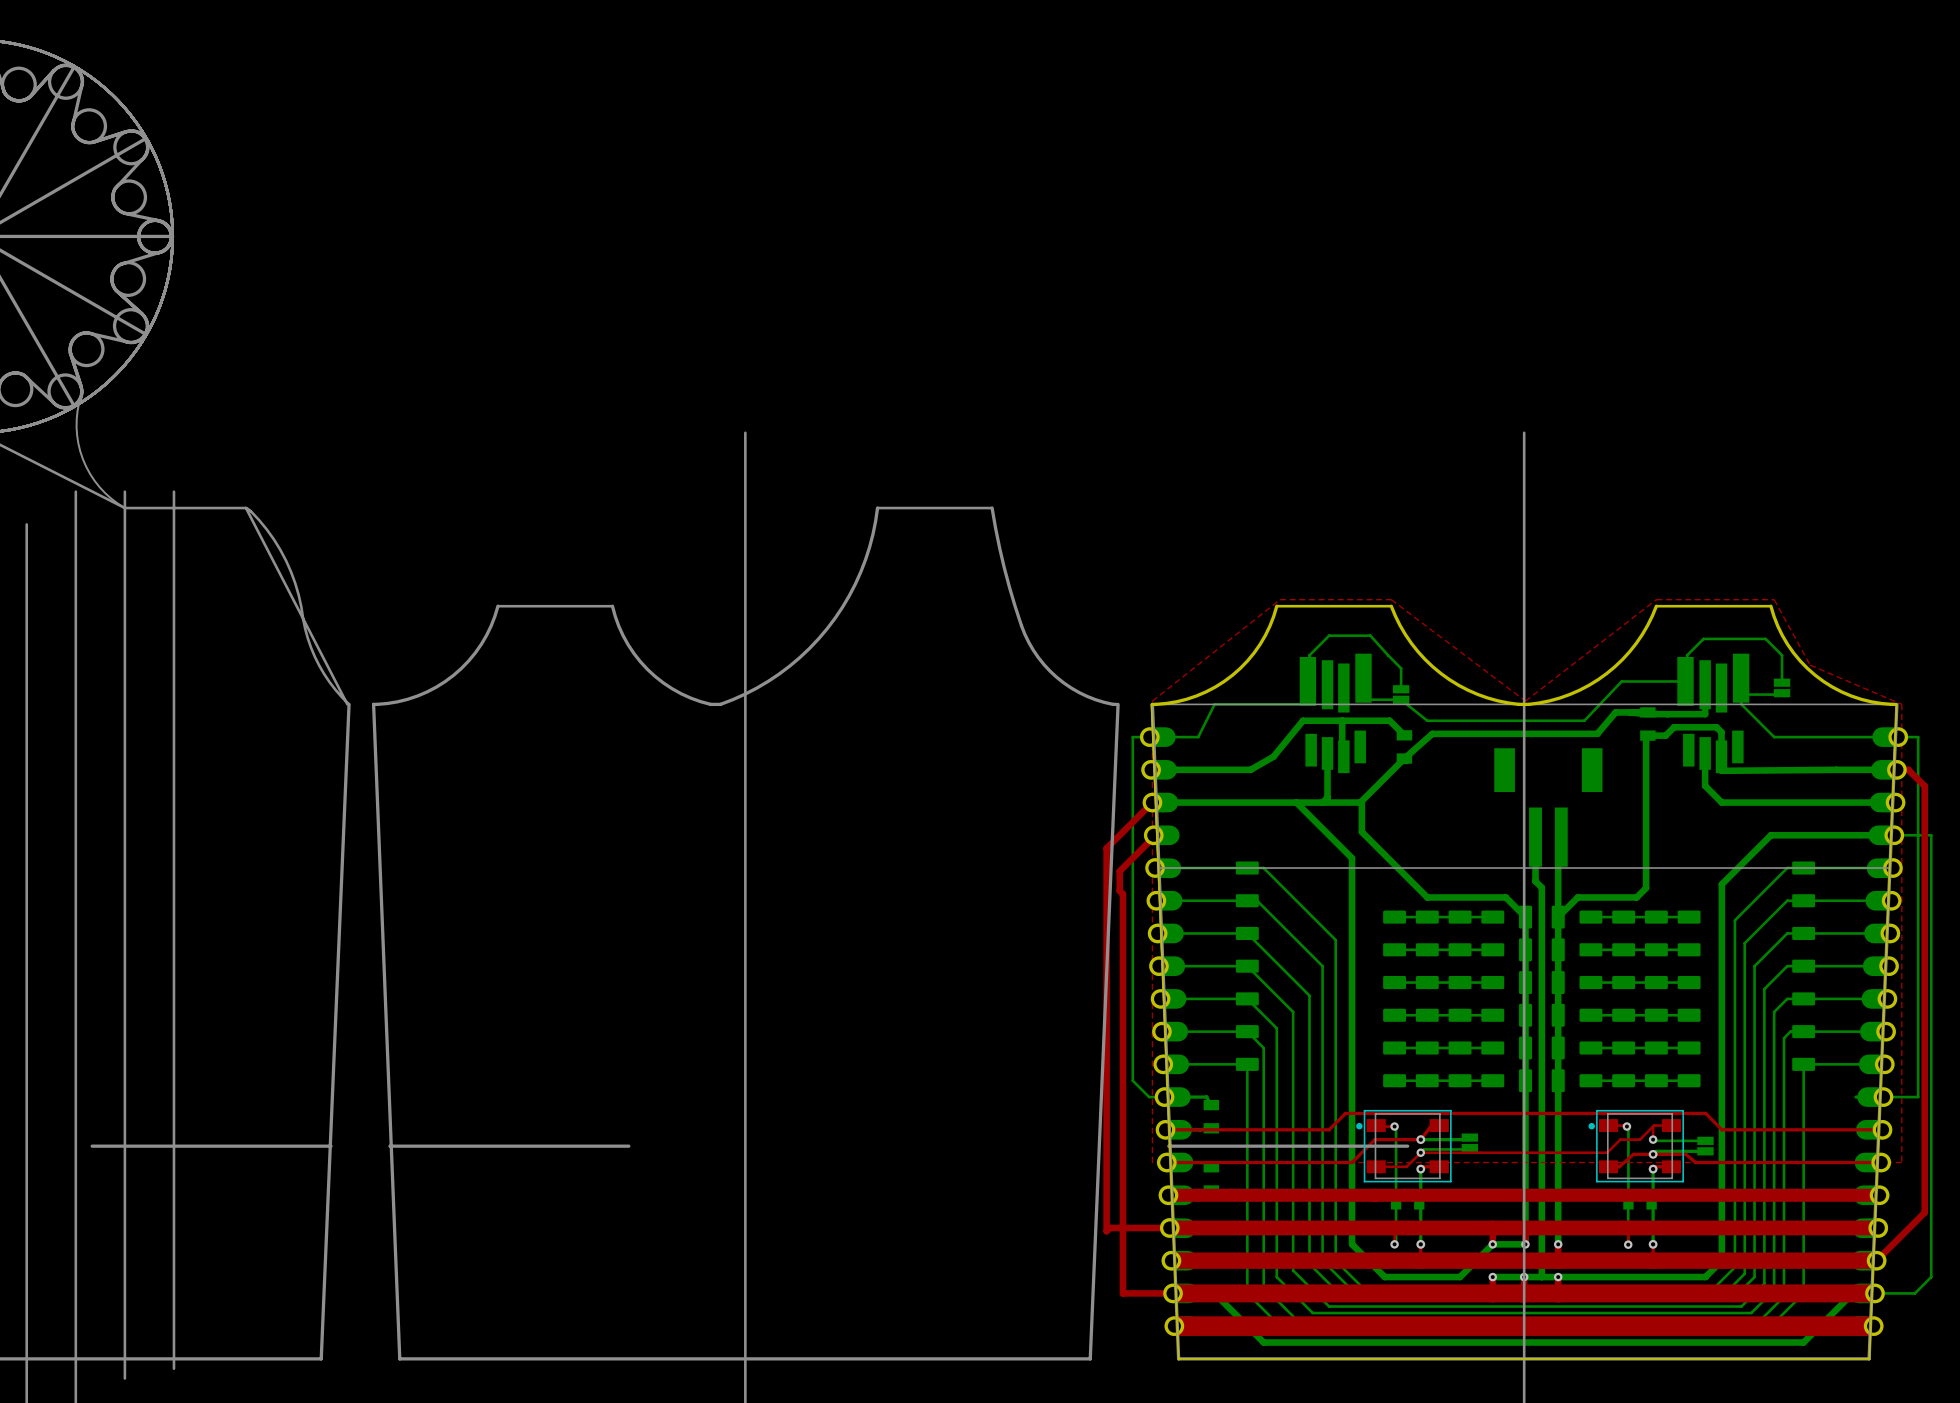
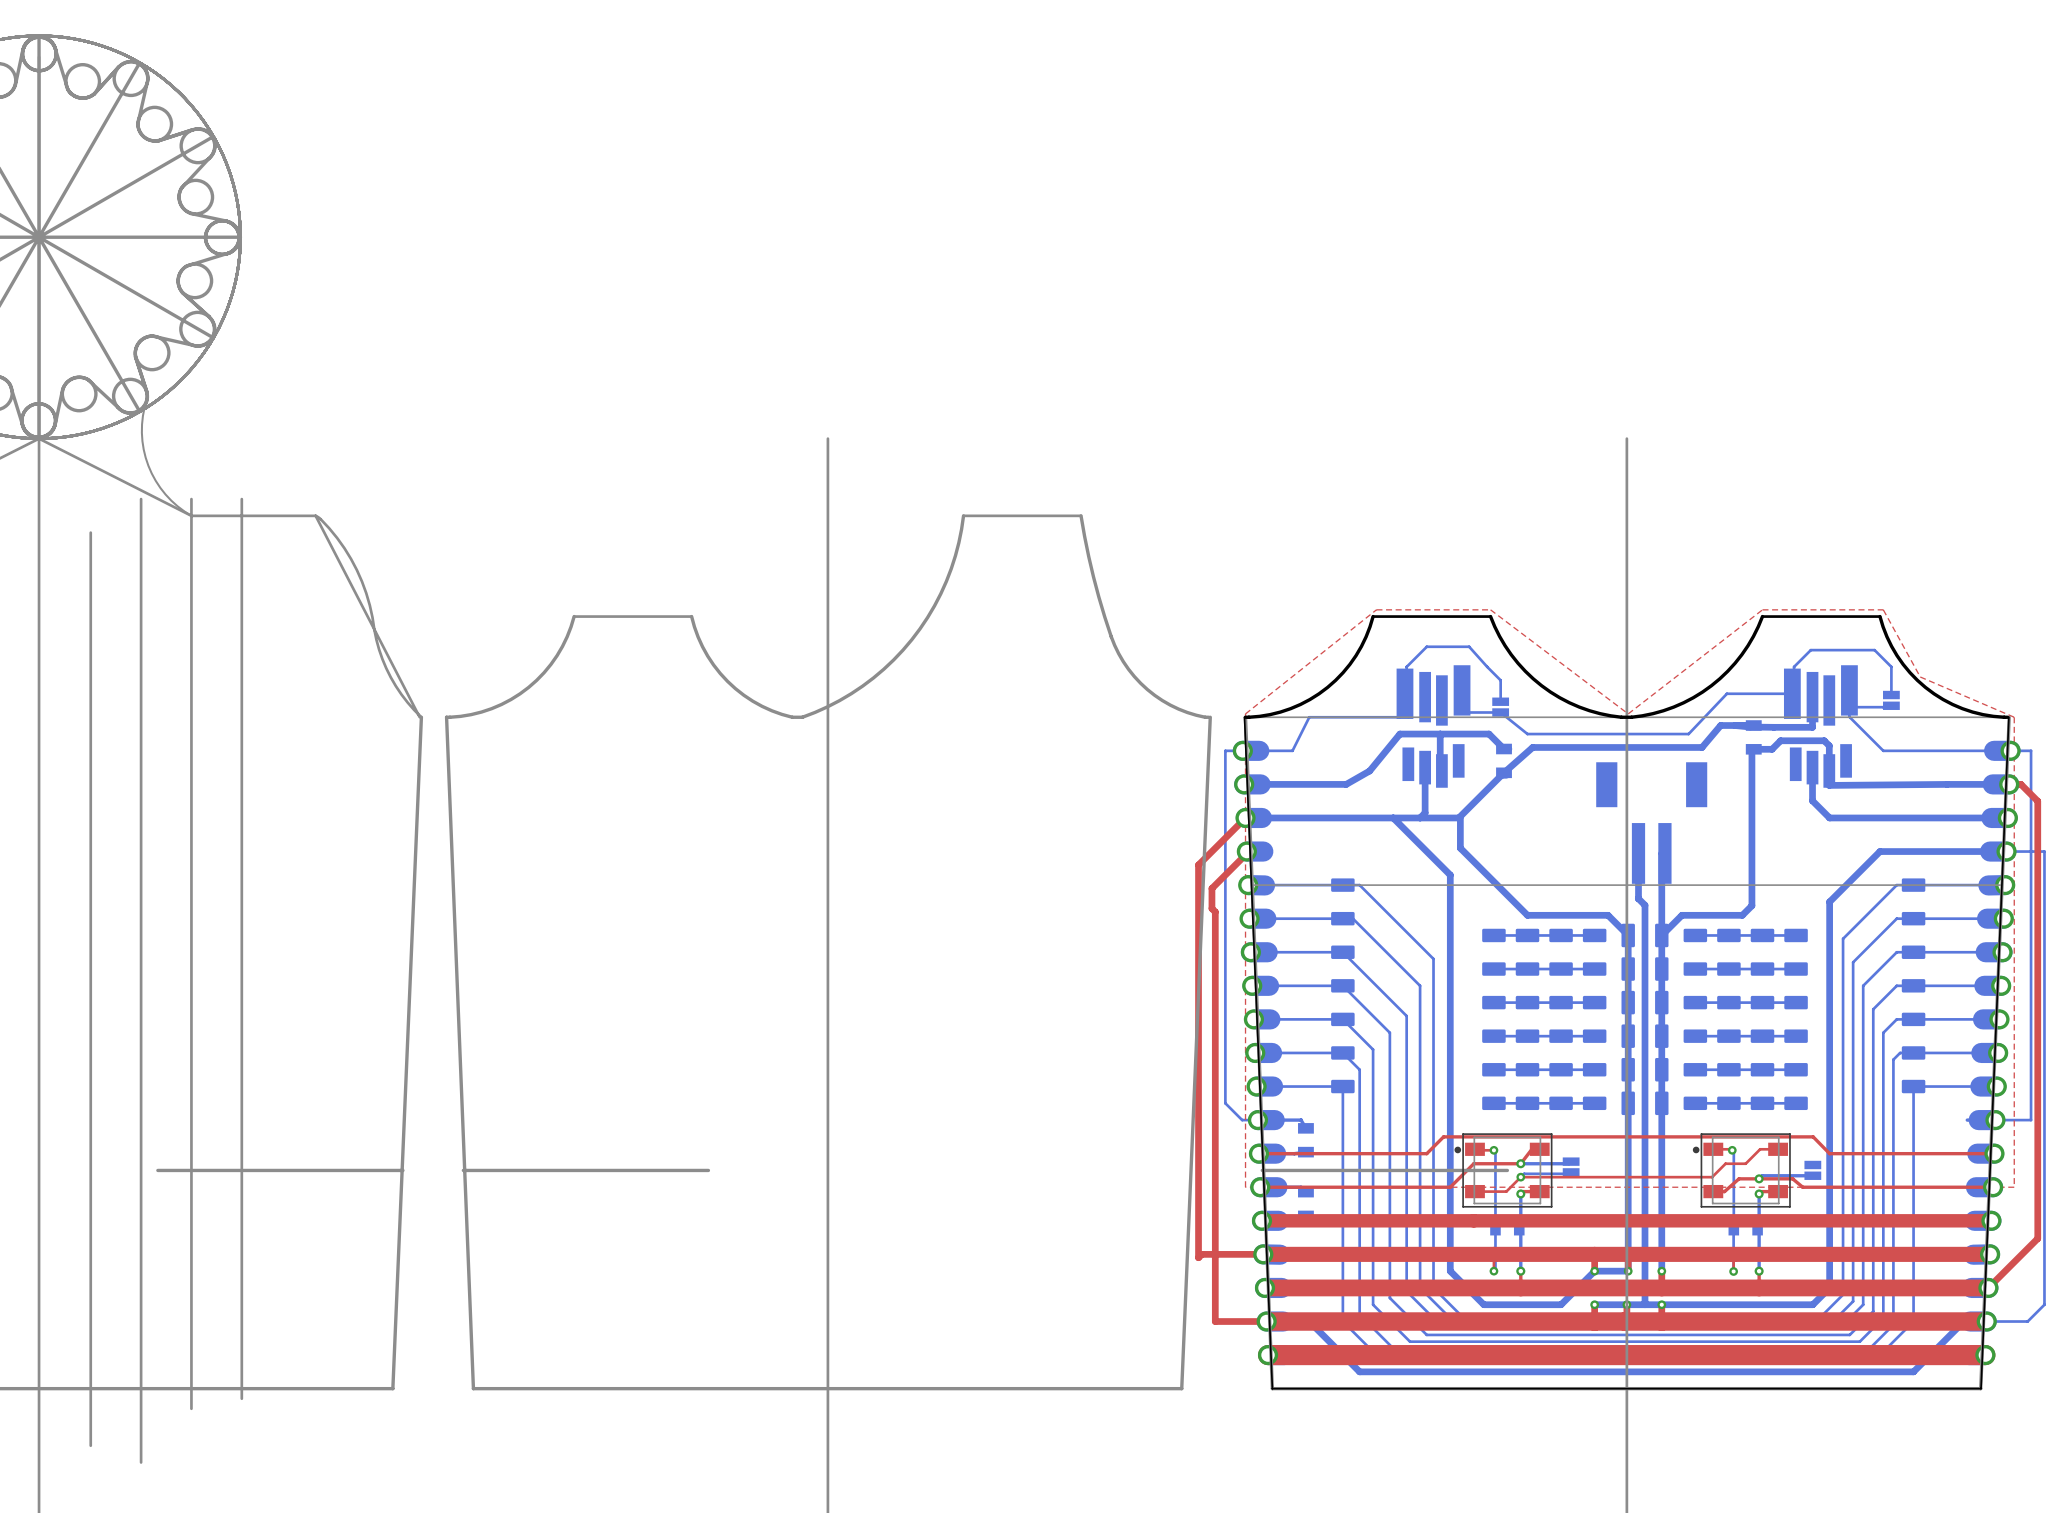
top track: (1653, 1126) (1653, 1139) -> none
bottom track: (1653, 1139) (1705, 1140) -> none
via: (1653, 1139) -> none

